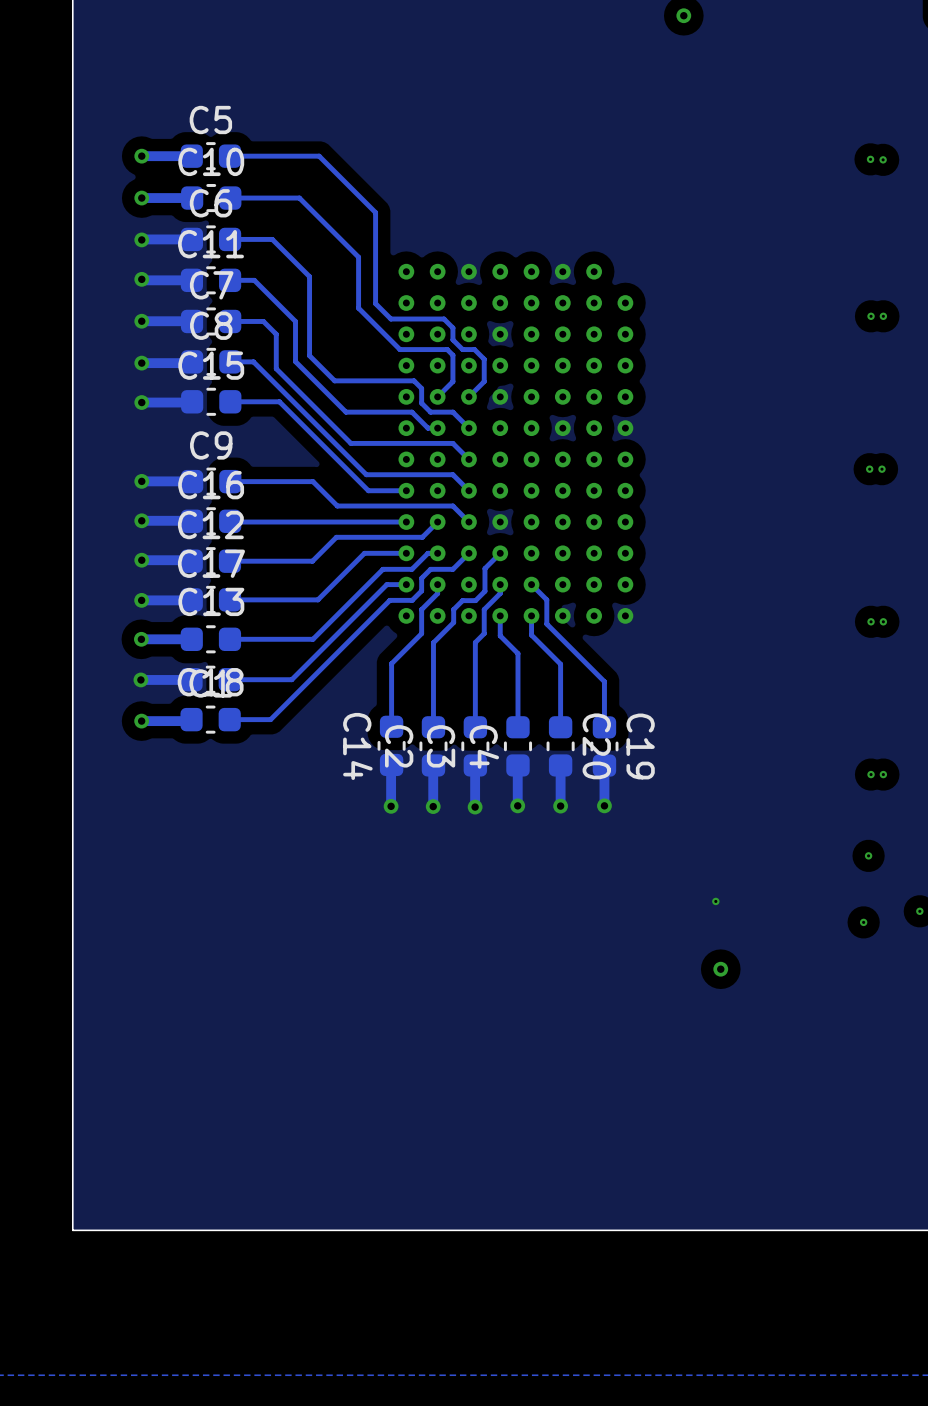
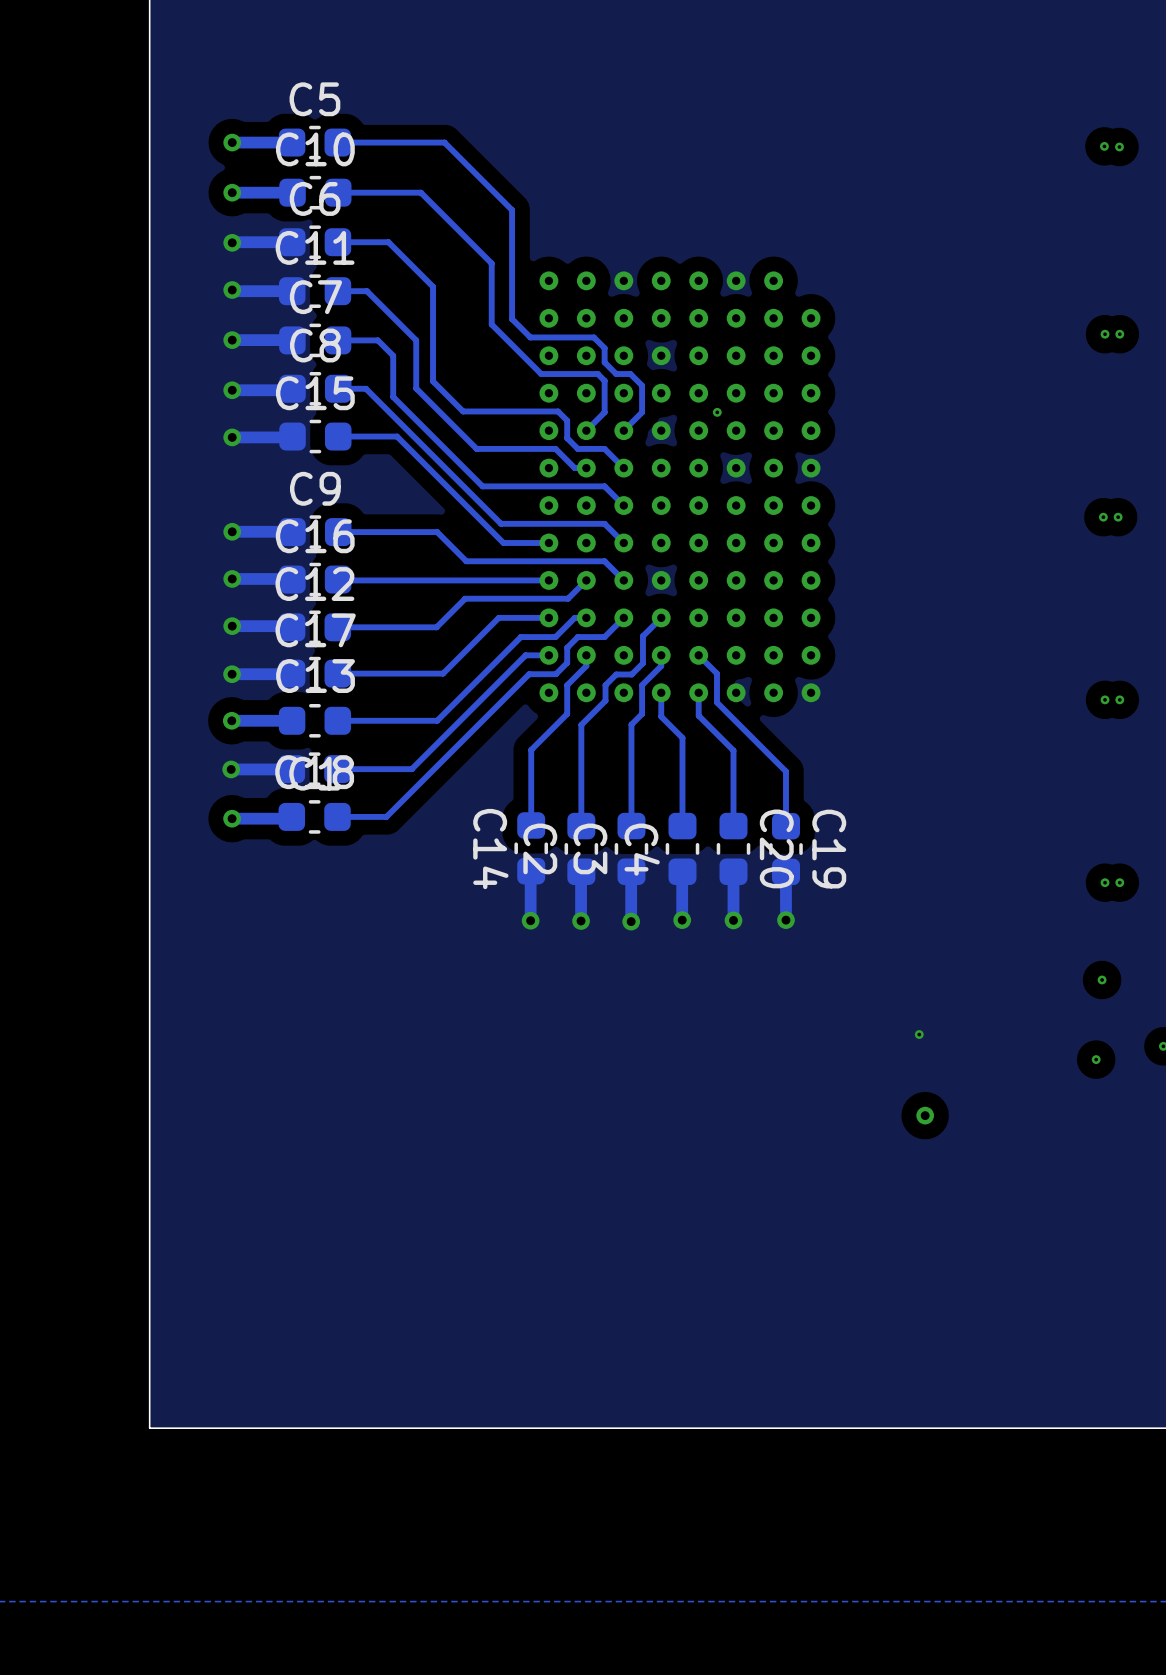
via: none -> (717, 412)

